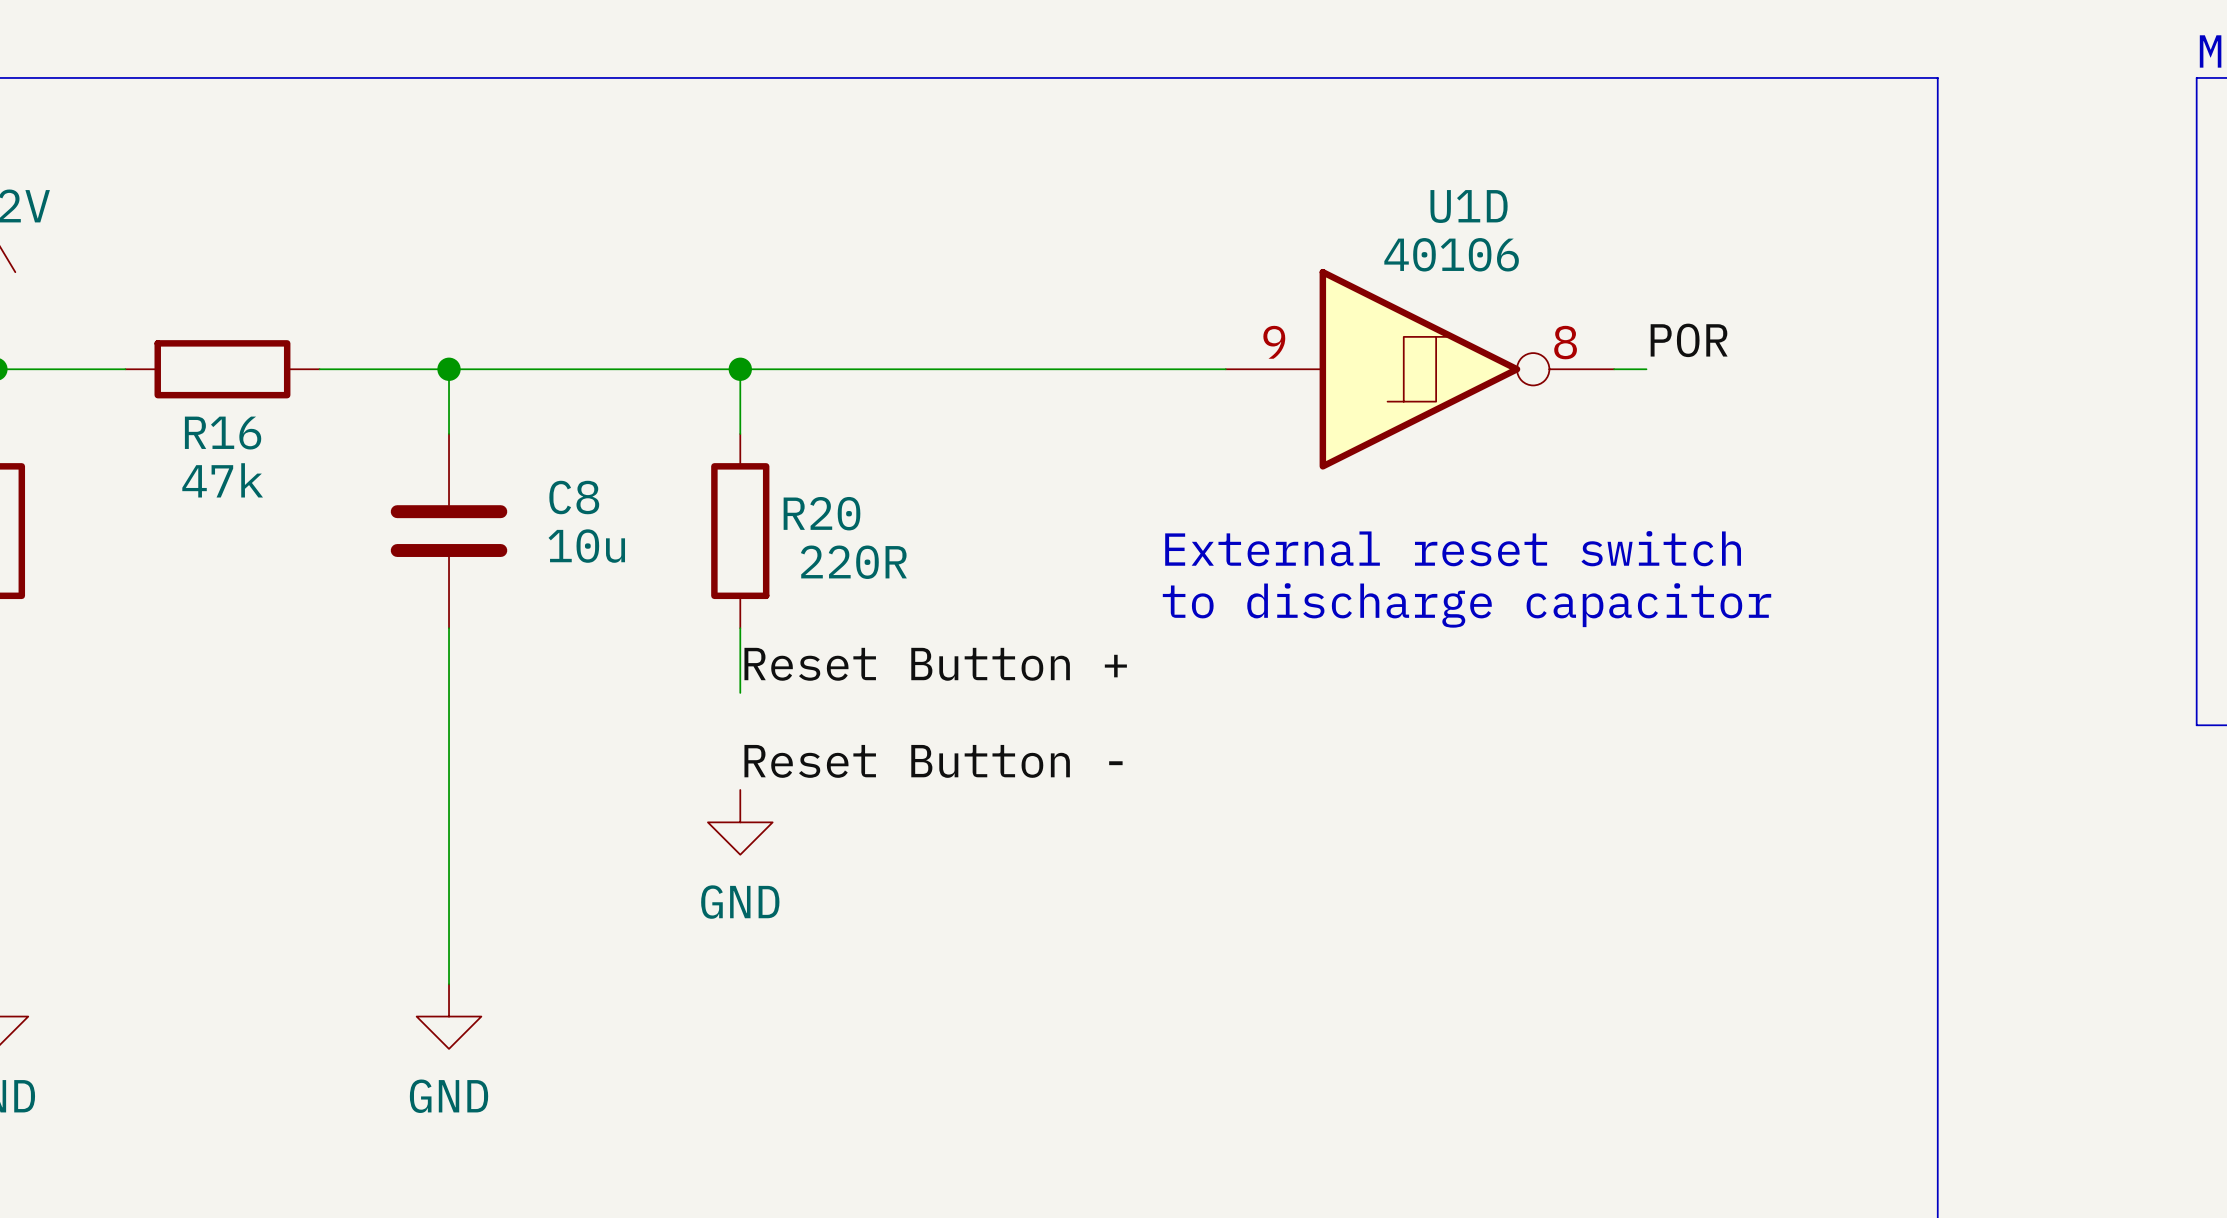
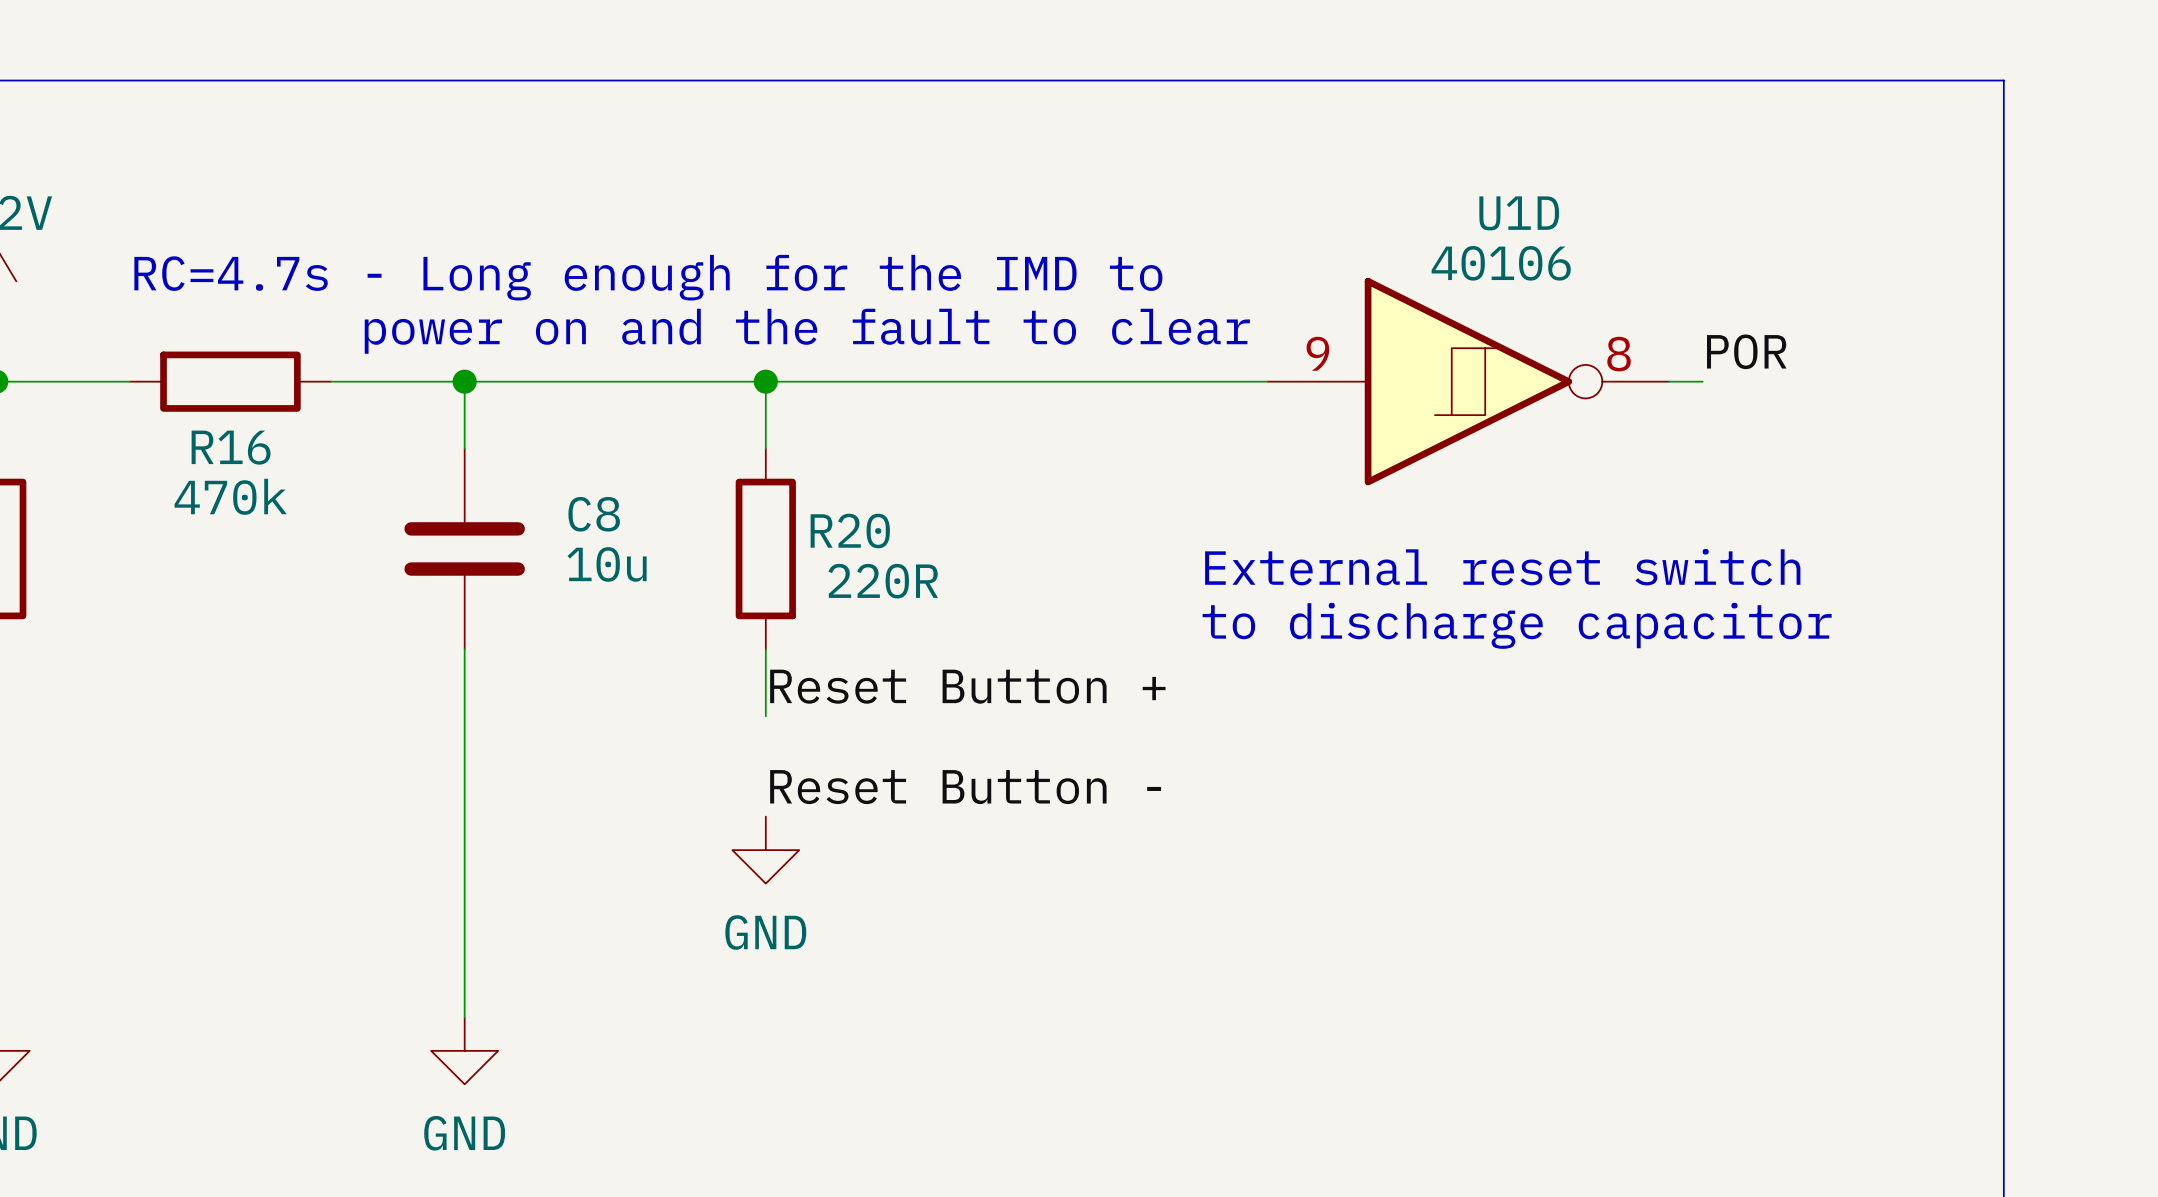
text: none -> RC=4.7s - Long enough for the IMD to (648, 277)
text: none -> power on and the fault to clear (807, 331)
R16 value: 47k (222, 480) -> 470k (230, 496)

